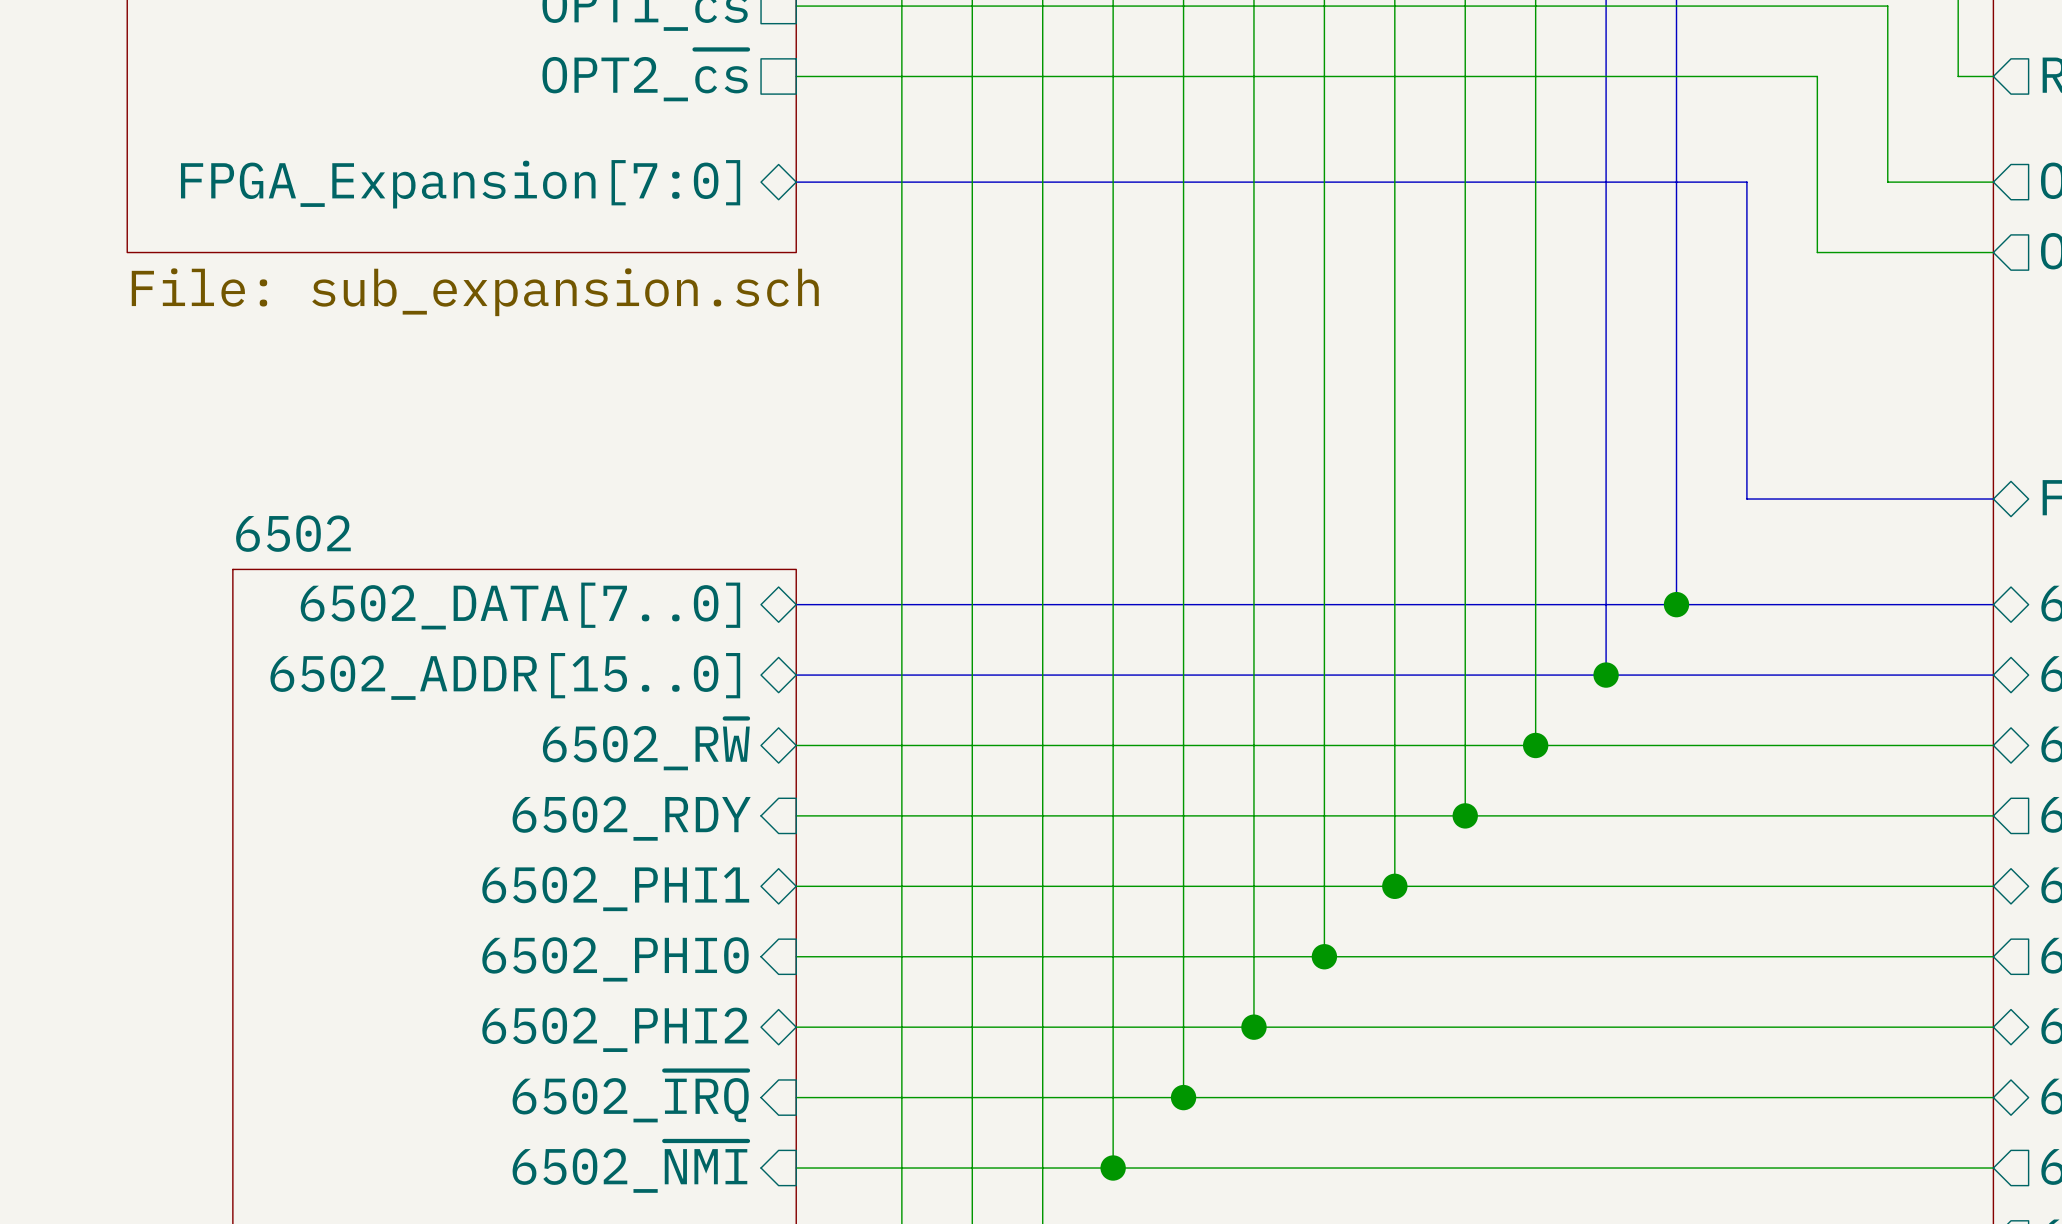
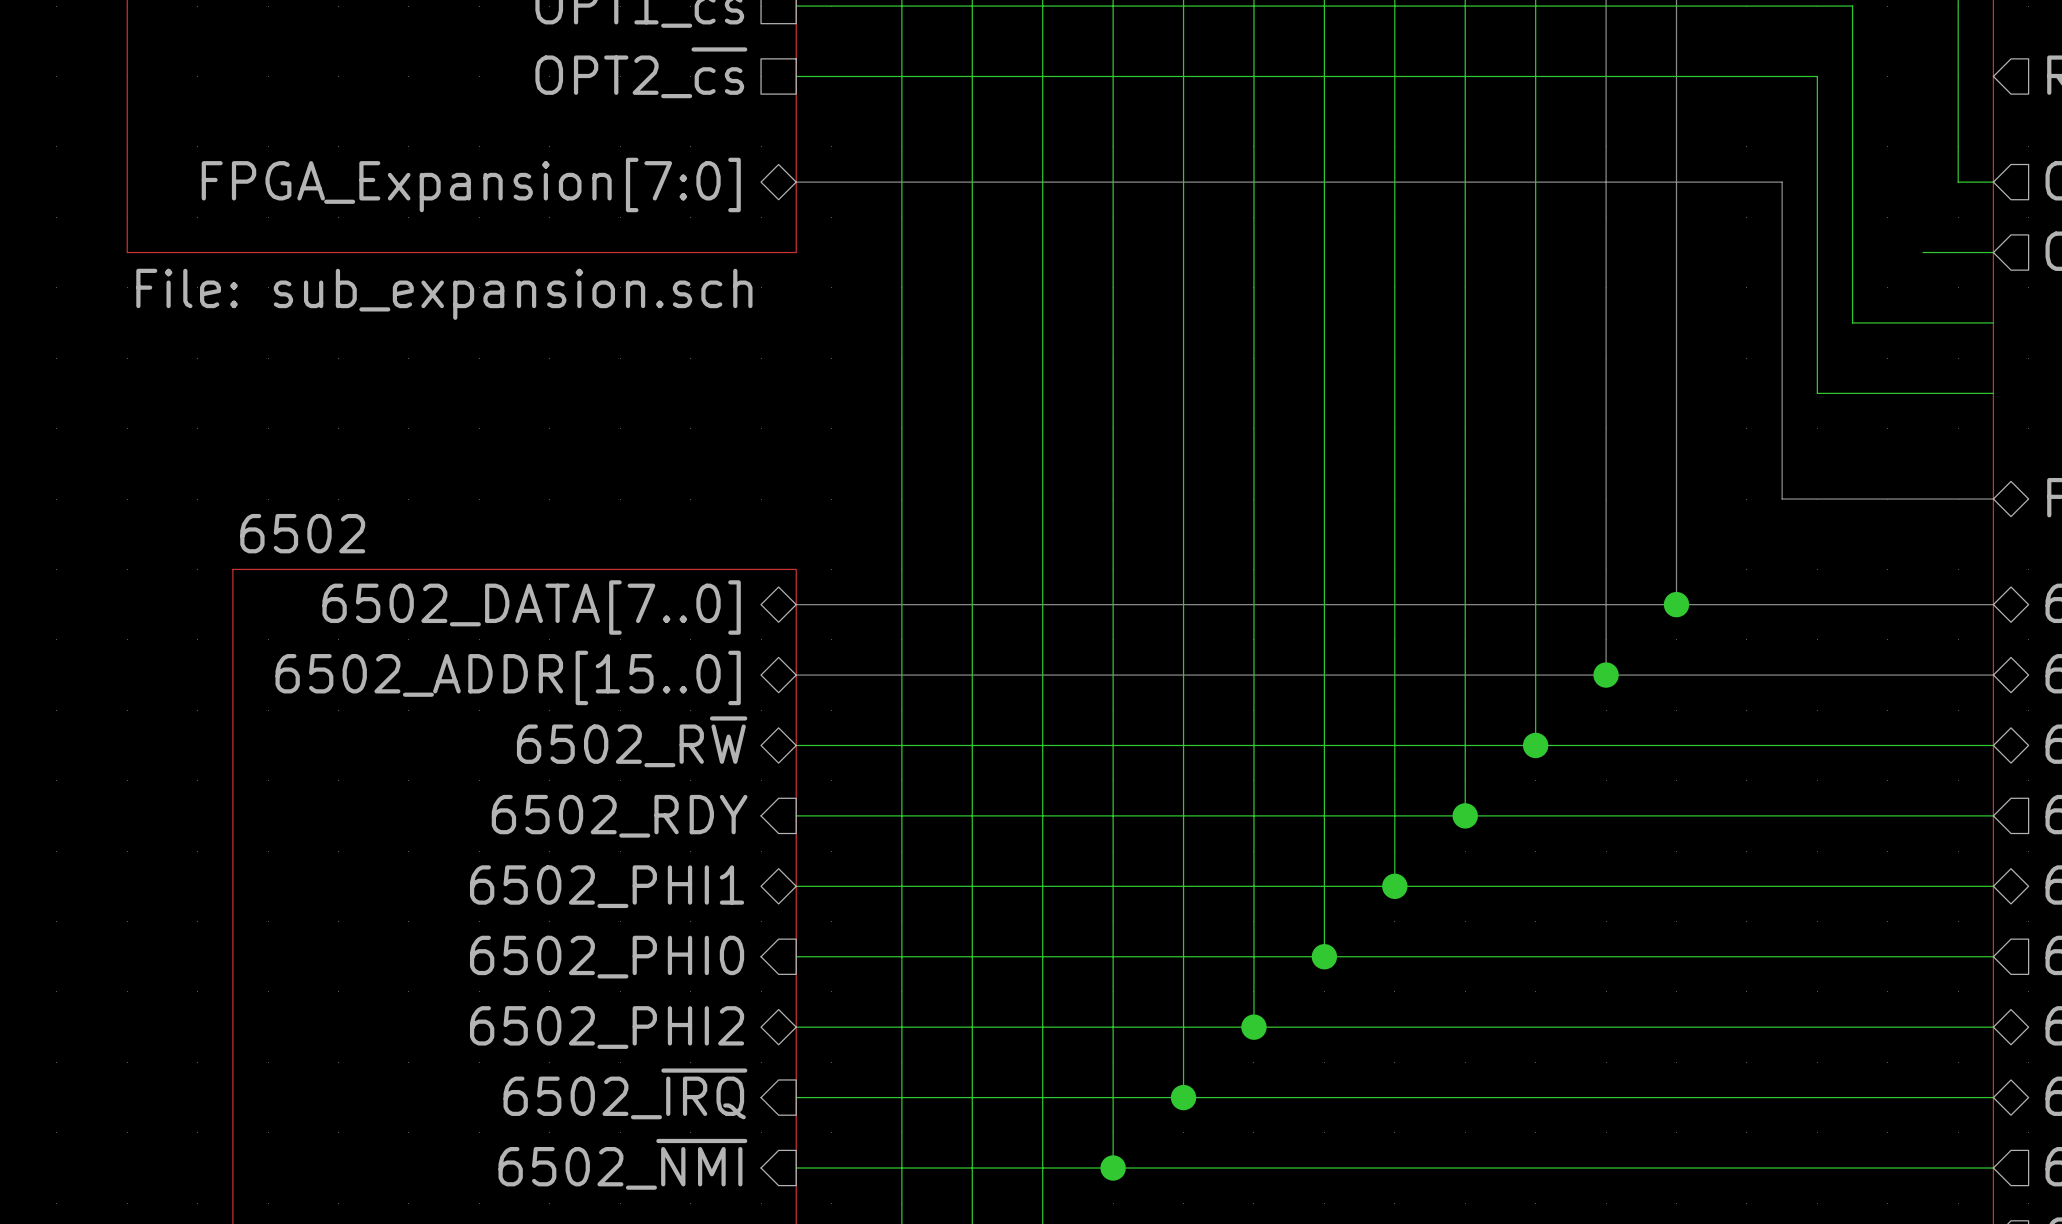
wire: (1852, 6) (1887, 6) (1887, 182) (1958, 182) -> (1852, 6) (1852, 322) (1993, 322)
wire: (1958, 76) (1993, 76) -> (1958, 76) (1958, 182)
bus: (1746, 182) (1746, 499) (1782, 499) -> (1746, 182) (1782, 182) (1782, 499)
wire: (1817, 252) (1922, 252) -> (1817, 252) (1817, 393) (1993, 393)

